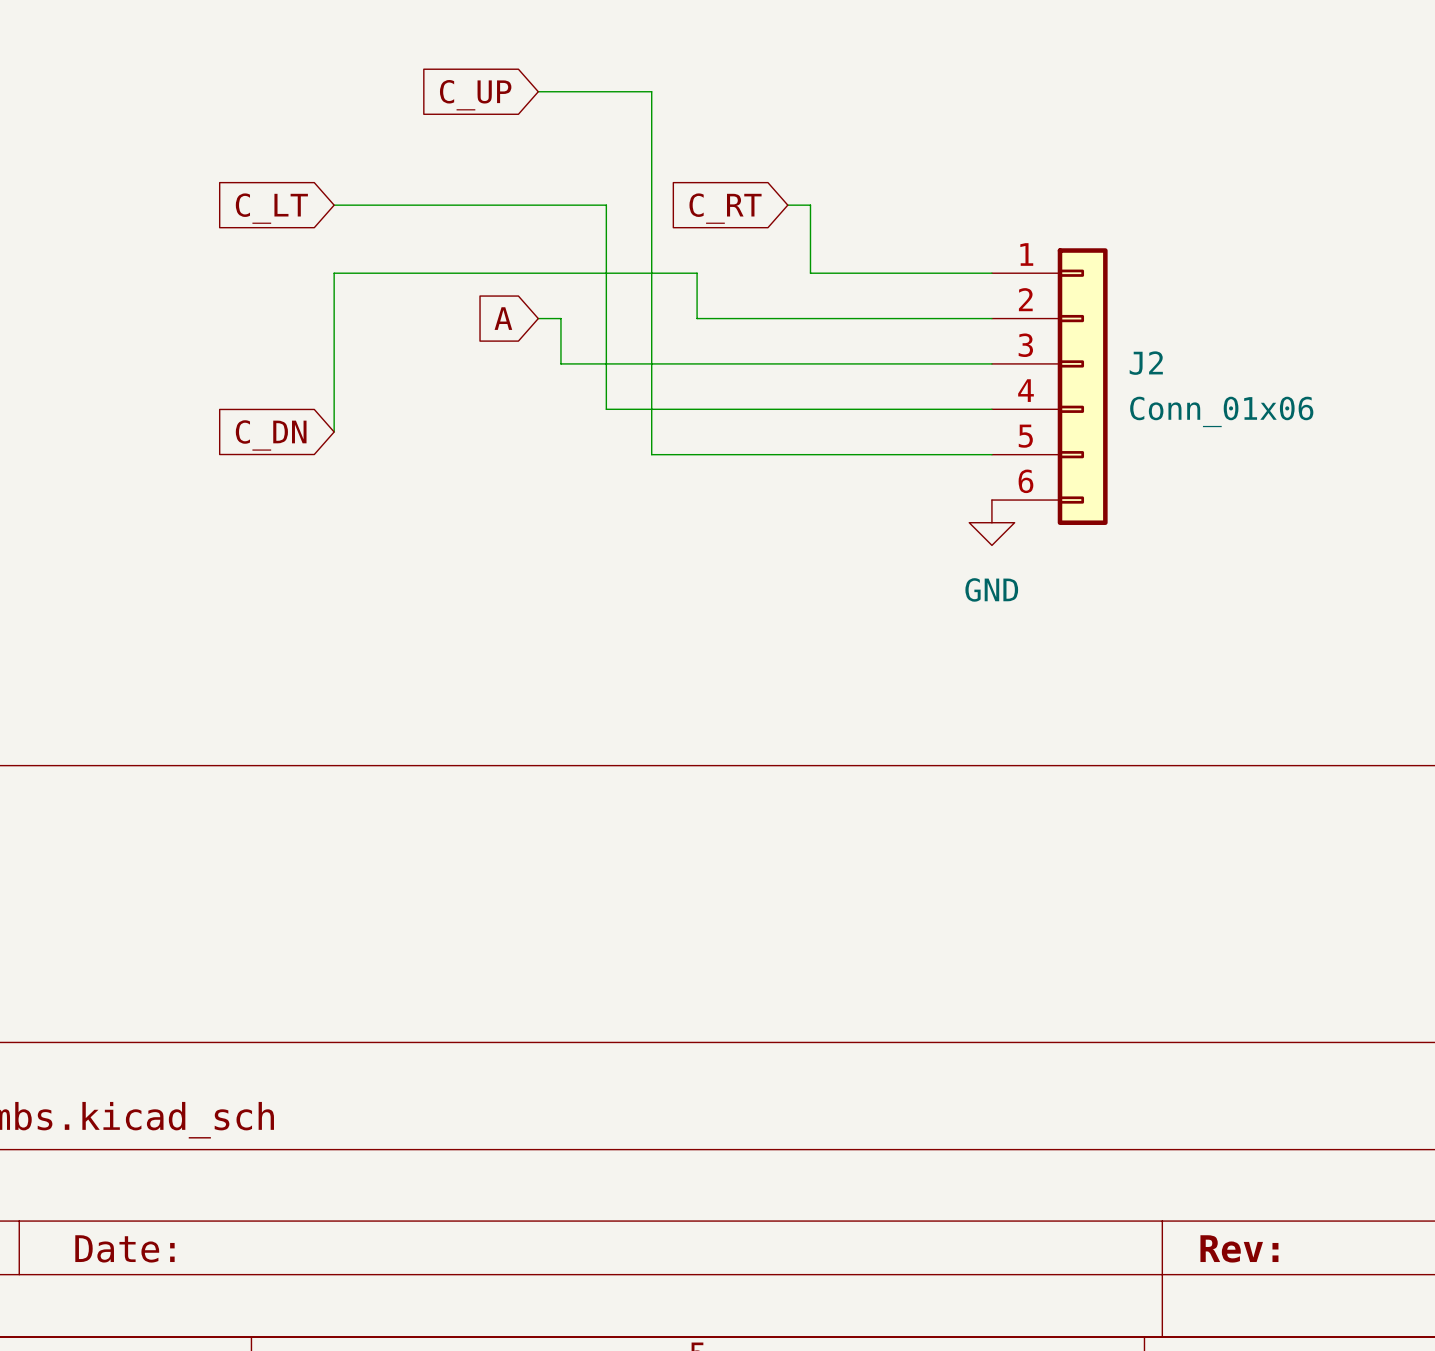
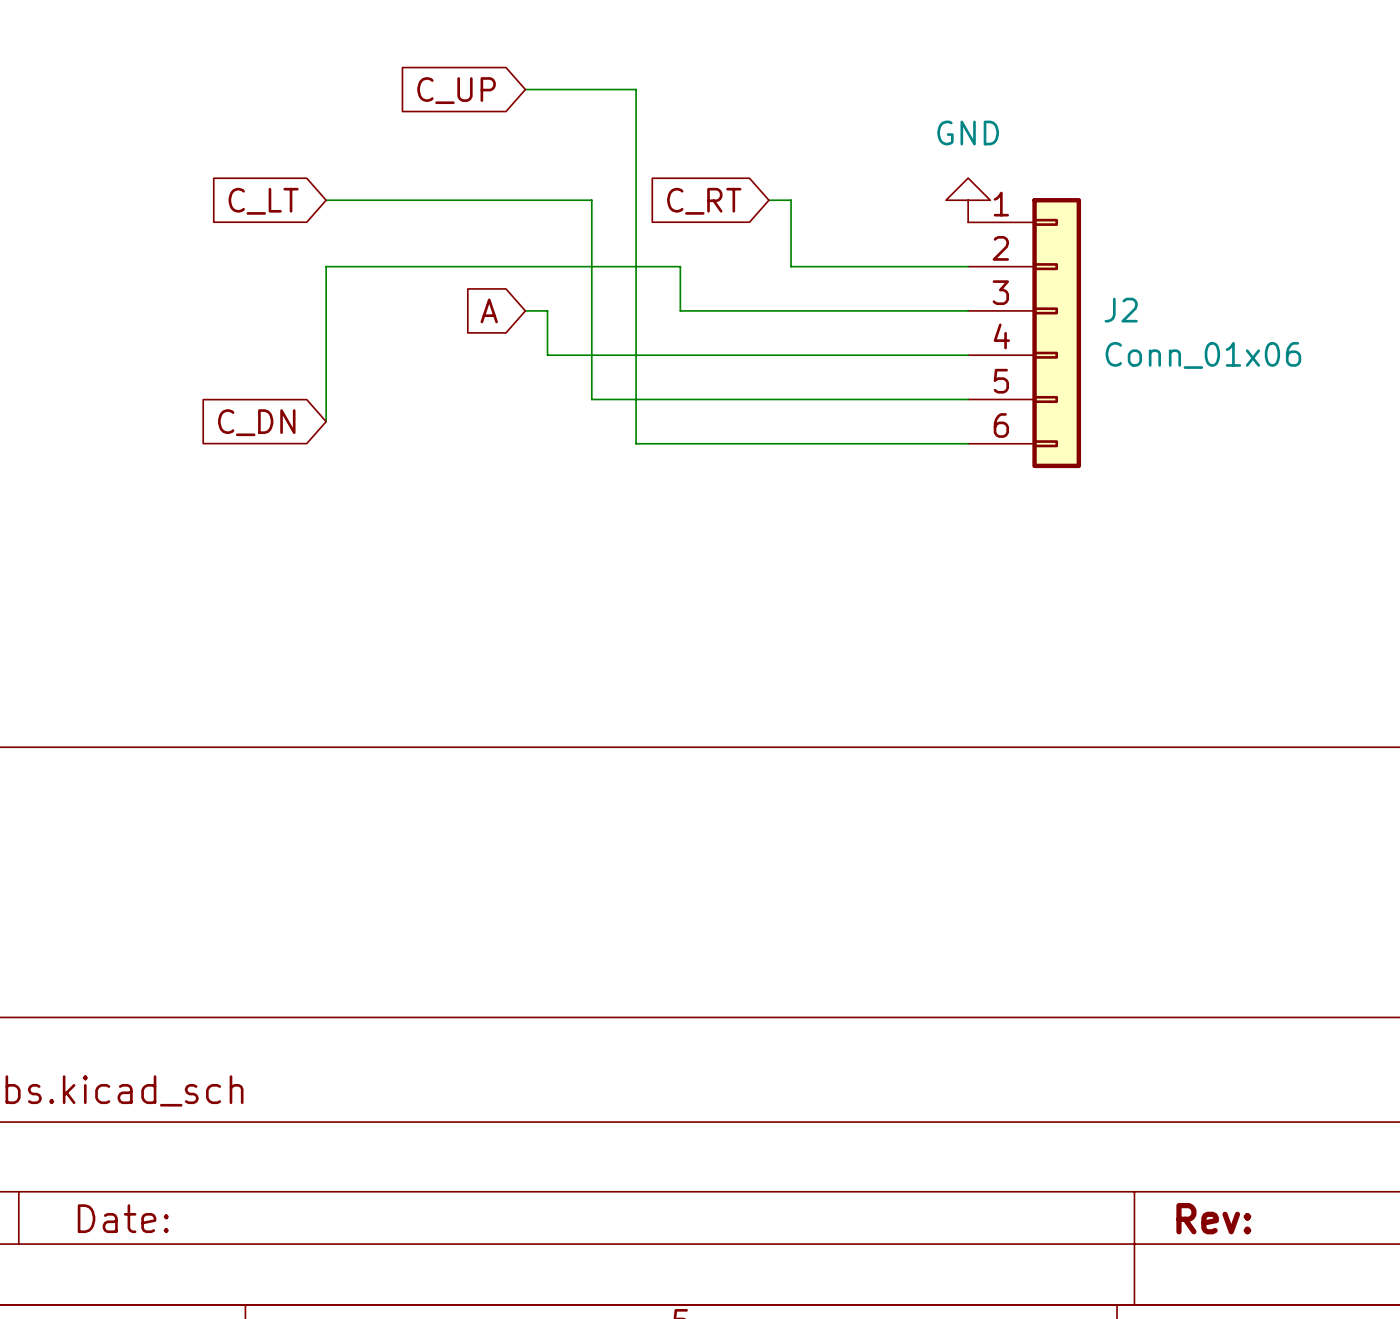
J2 position: (1049, 386) -> (1024, 333)
power symbol rotation: 0° (991, 522) -> 180° (968, 200)
power symbol position: GND (991, 522) -> GND (968, 200)

